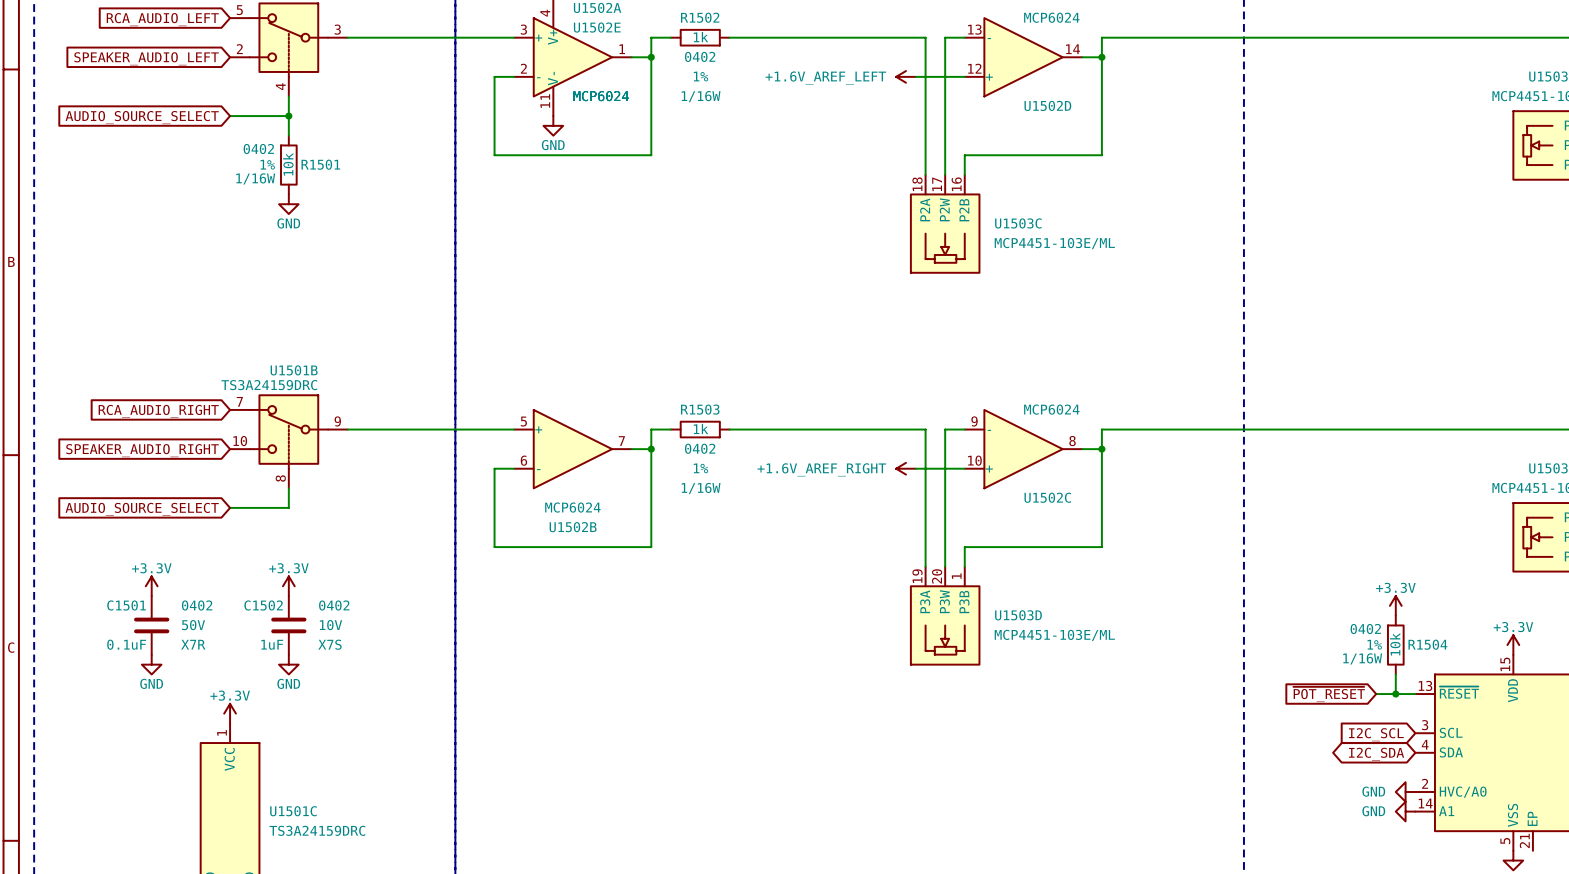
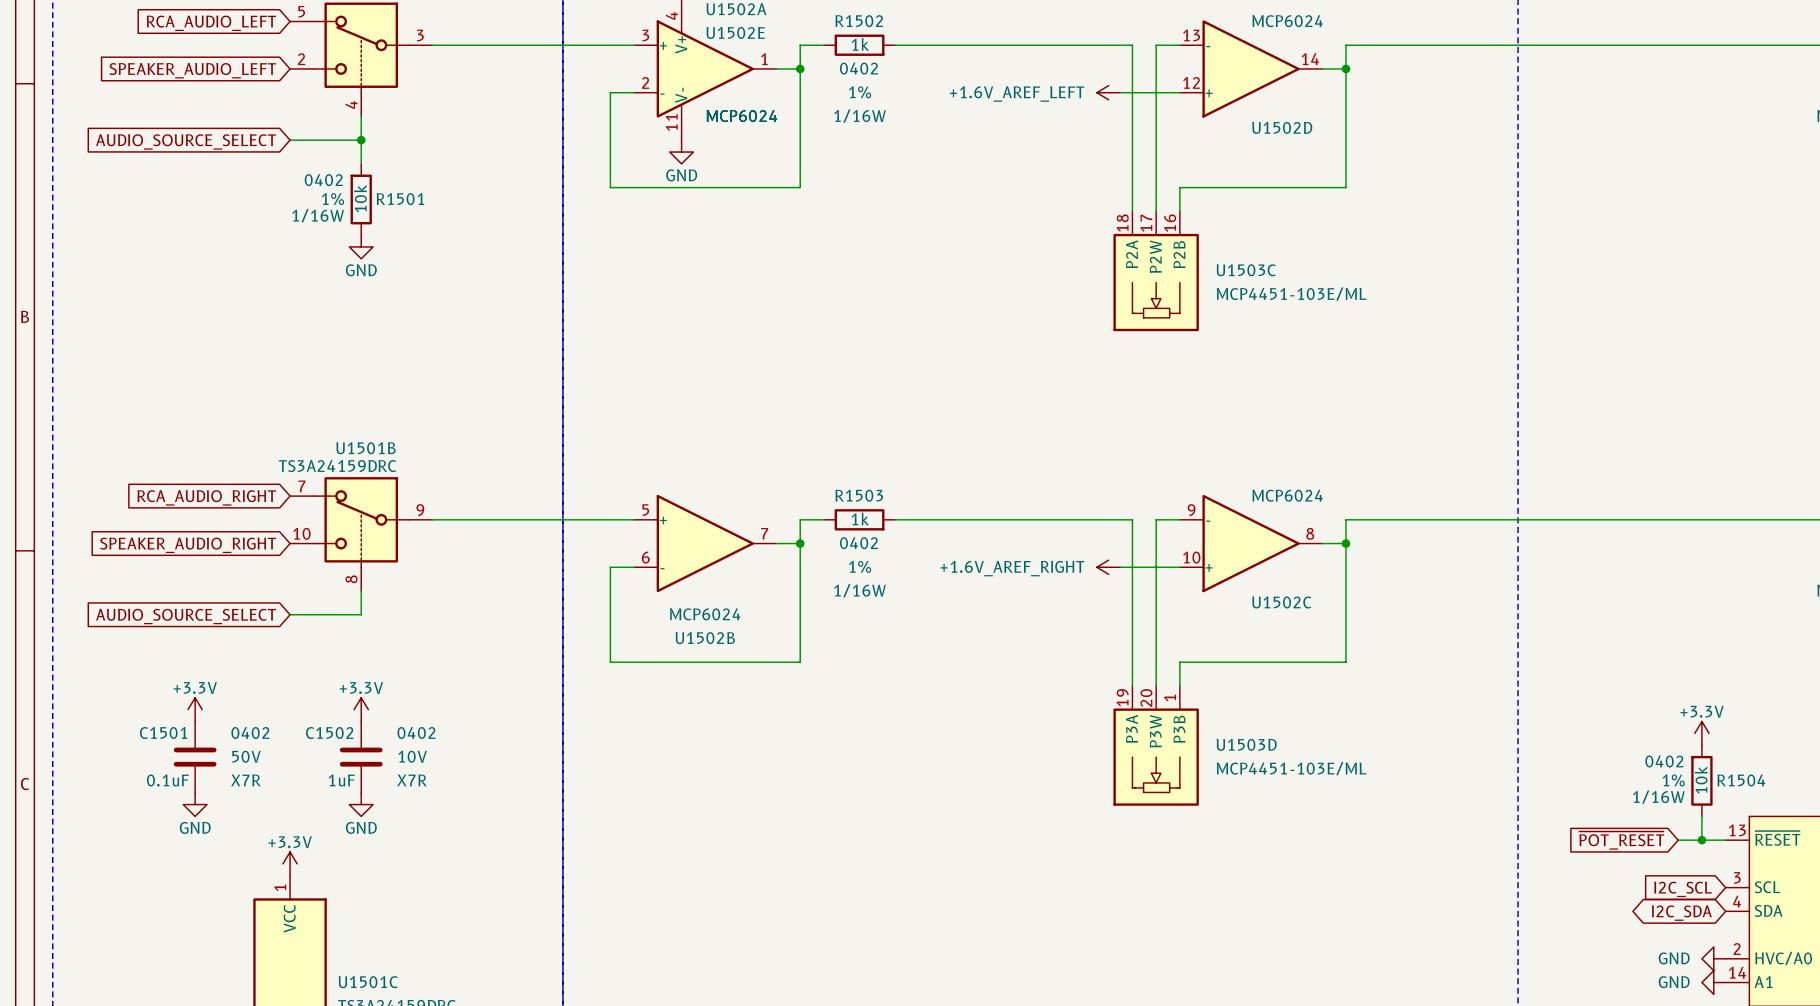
C1502 text: X7S (329, 644) -> X7R (412, 780)

